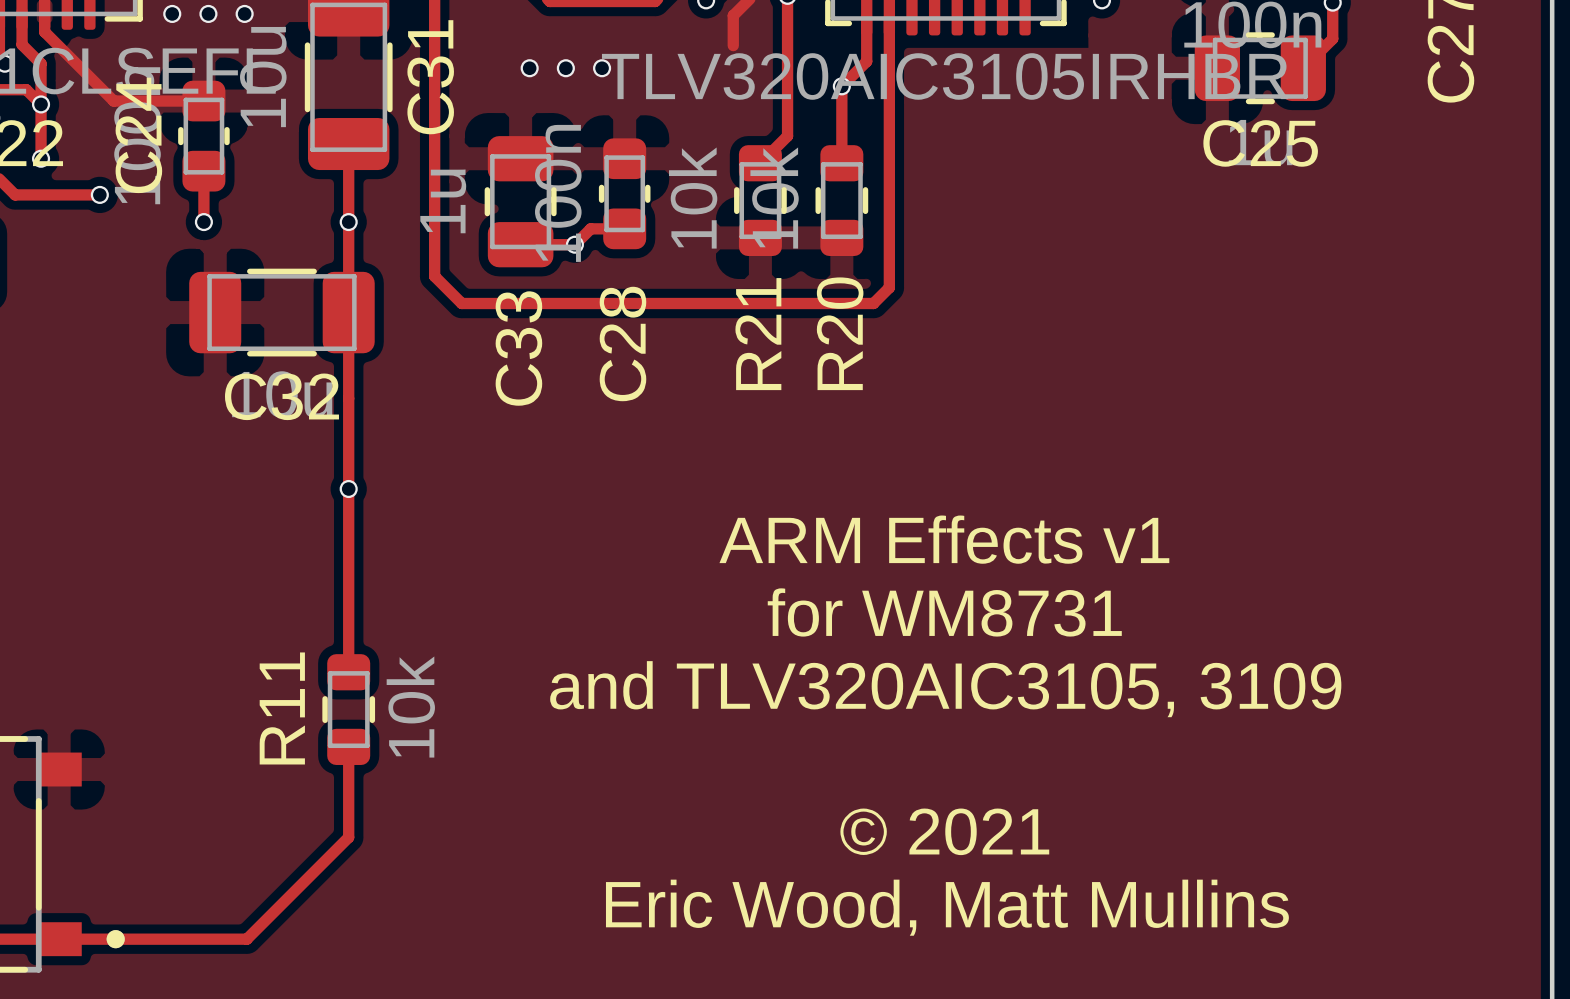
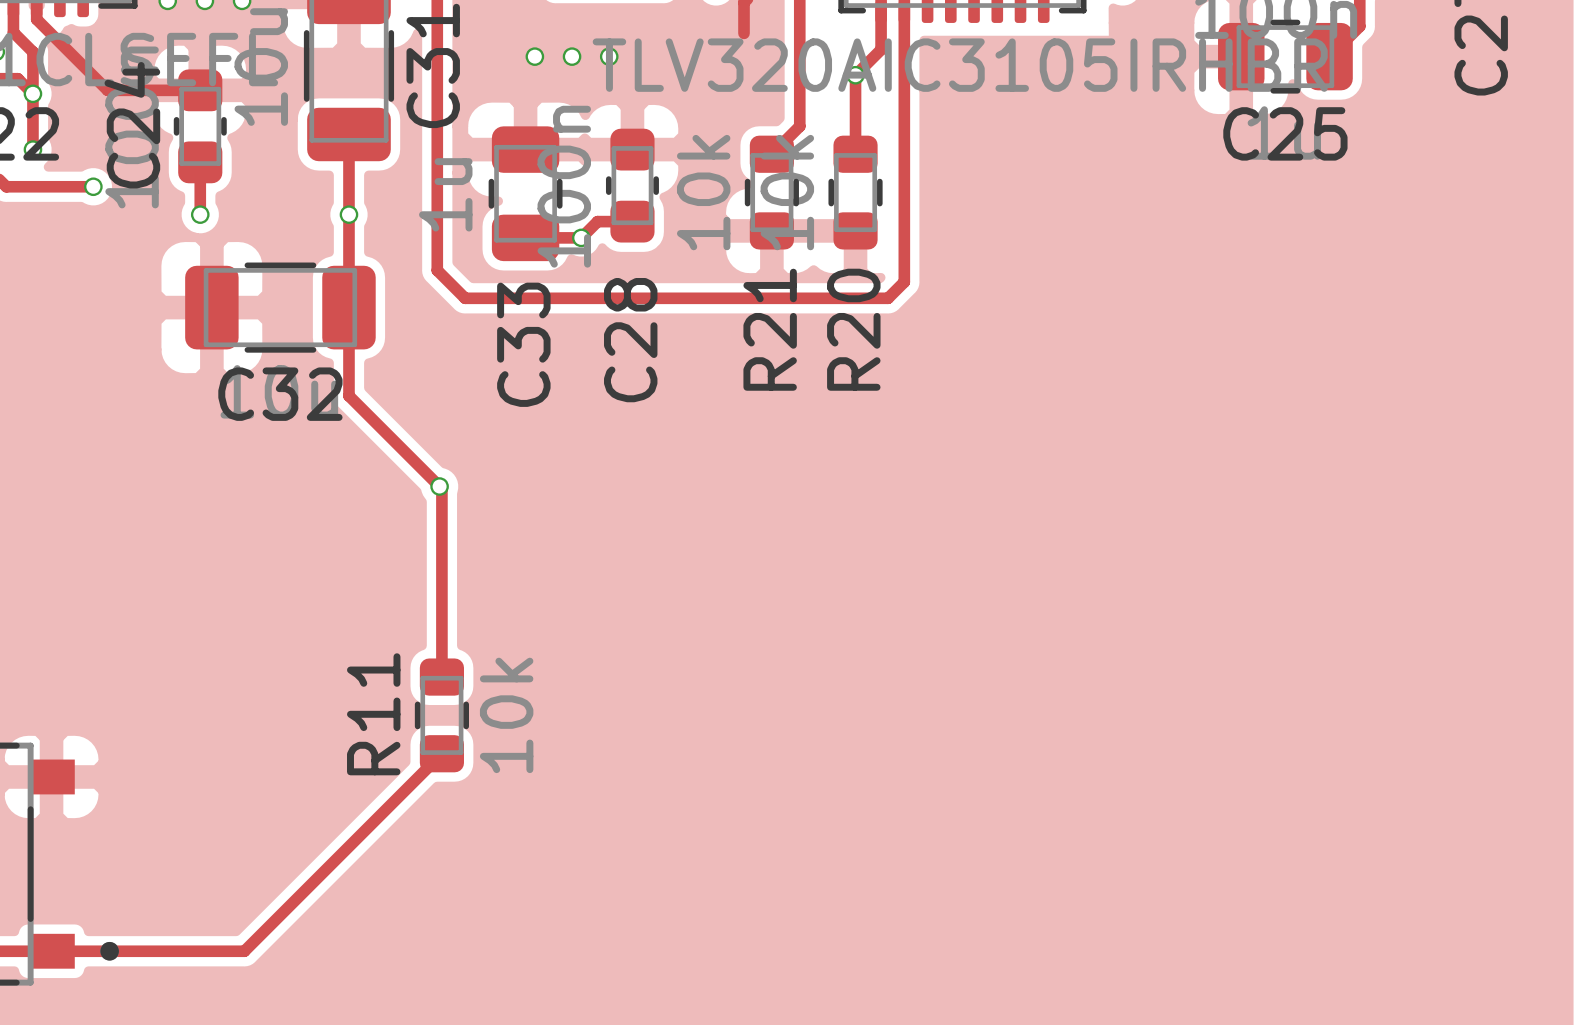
track: (348, 398) (348, 672) -> (348, 395) (441, 488) (441, 677)
via position: (348, 489) -> (439, 486)
text: ARM Effects v1 (944, 539) -> none
text: for WM8731 (944, 612) -> none
text: and TLV320AIC3105, 3109 (945, 689) -> none
R11 position: (348, 709) -> (441, 715)
track: (348, 746) (348, 837) -> (441, 753) (348, 846)
text: © 2021 (944, 831) -> none
text: Eric Wood, Matt Mullins (947, 907) -> none

